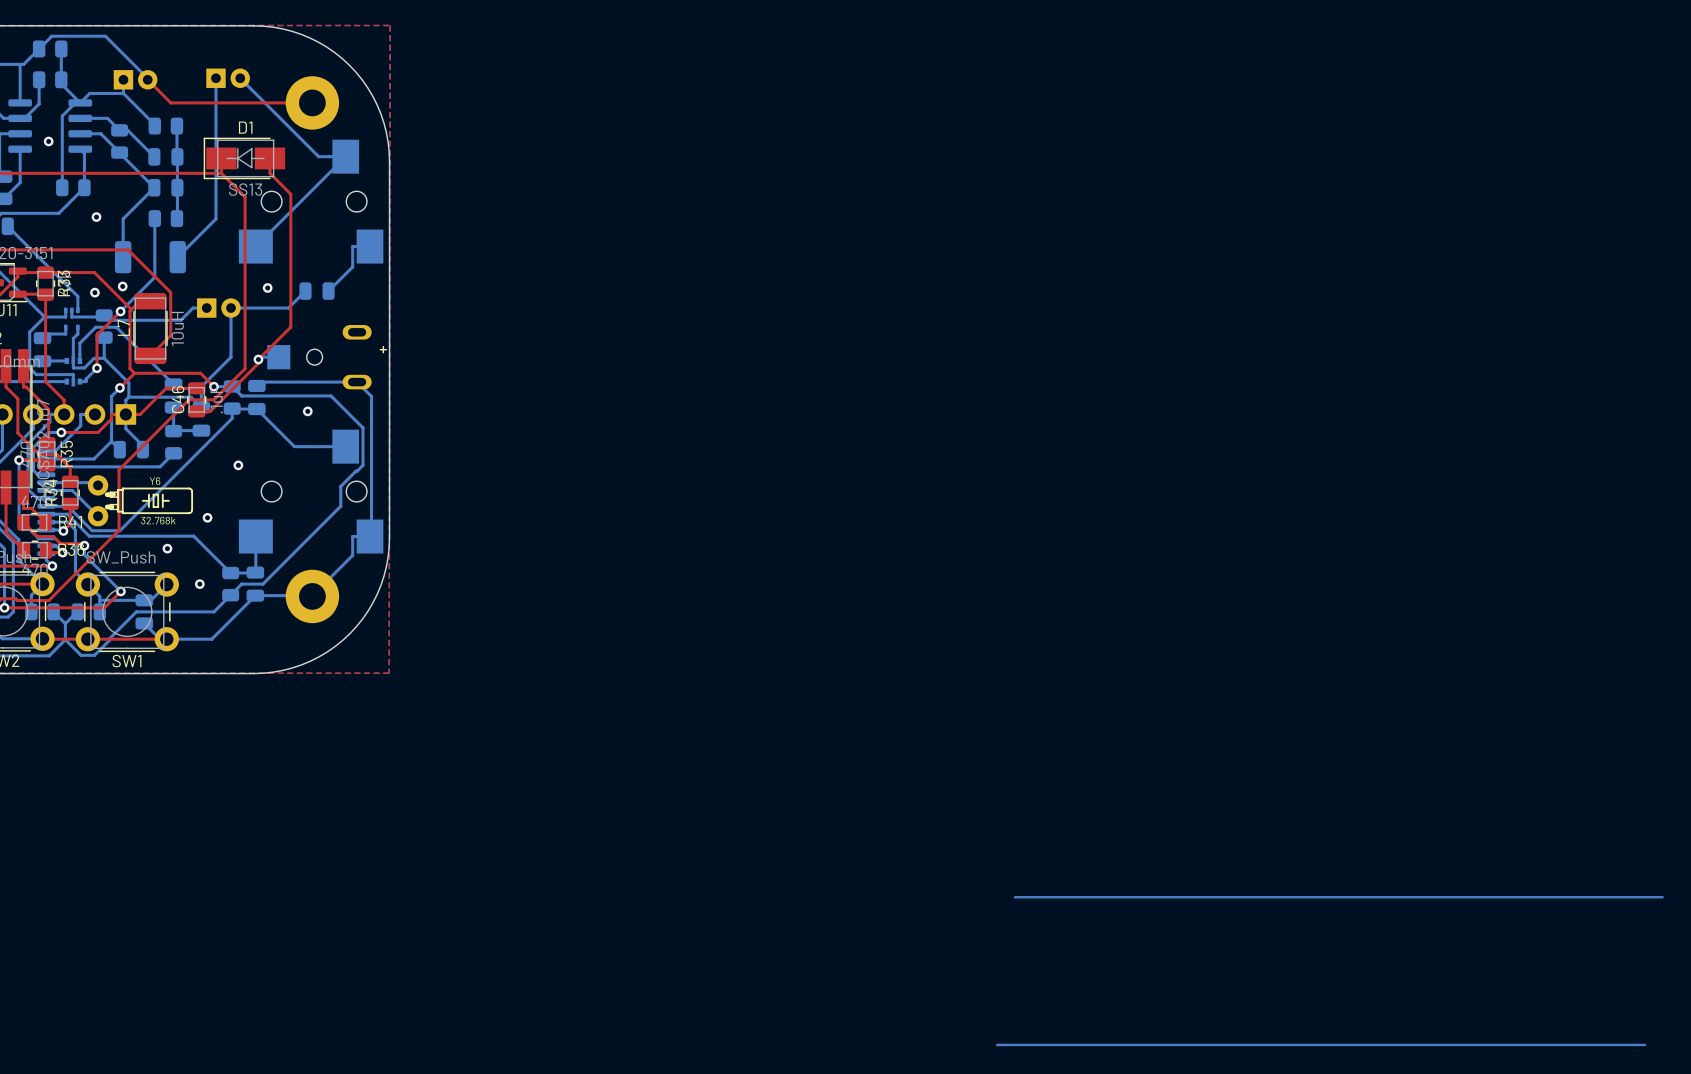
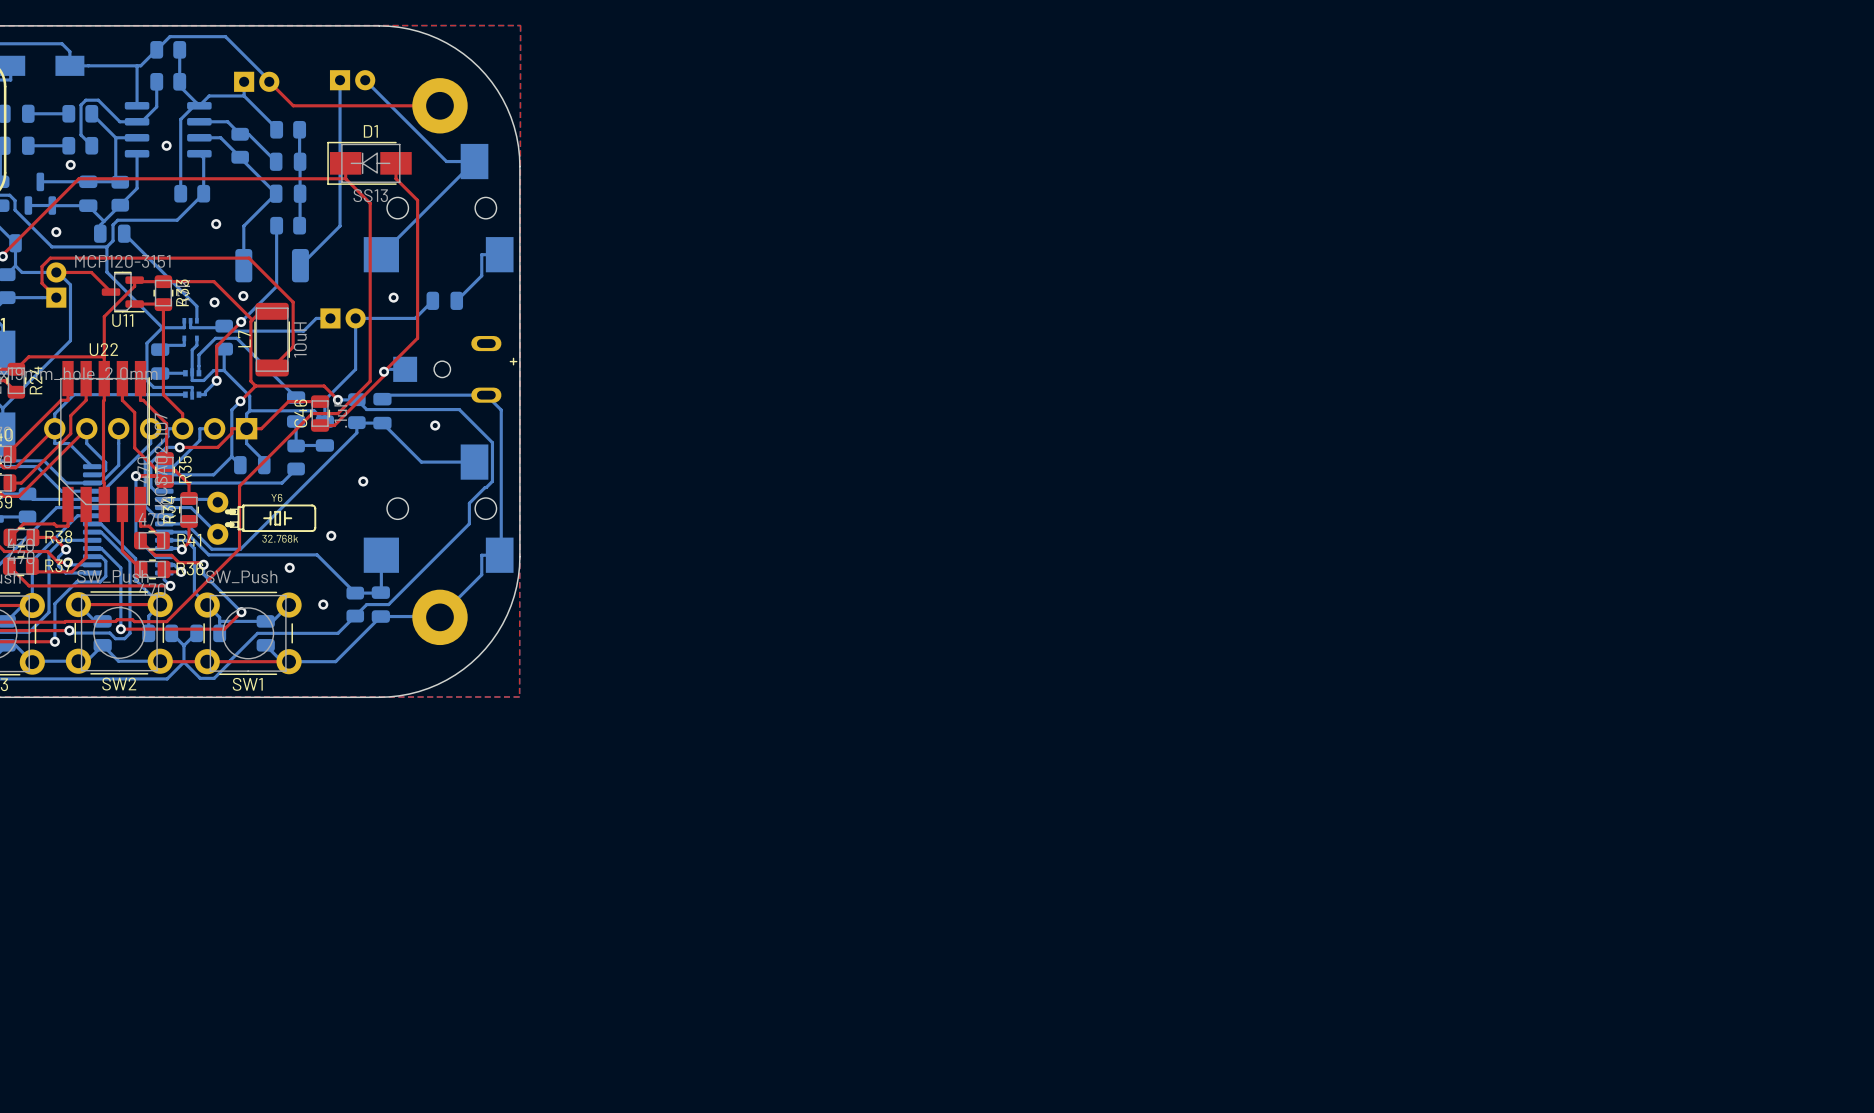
bottom track: (1014, 897) (1662, 897) -> none
bottom track: (997, 1044) (1644, 1044) -> none

